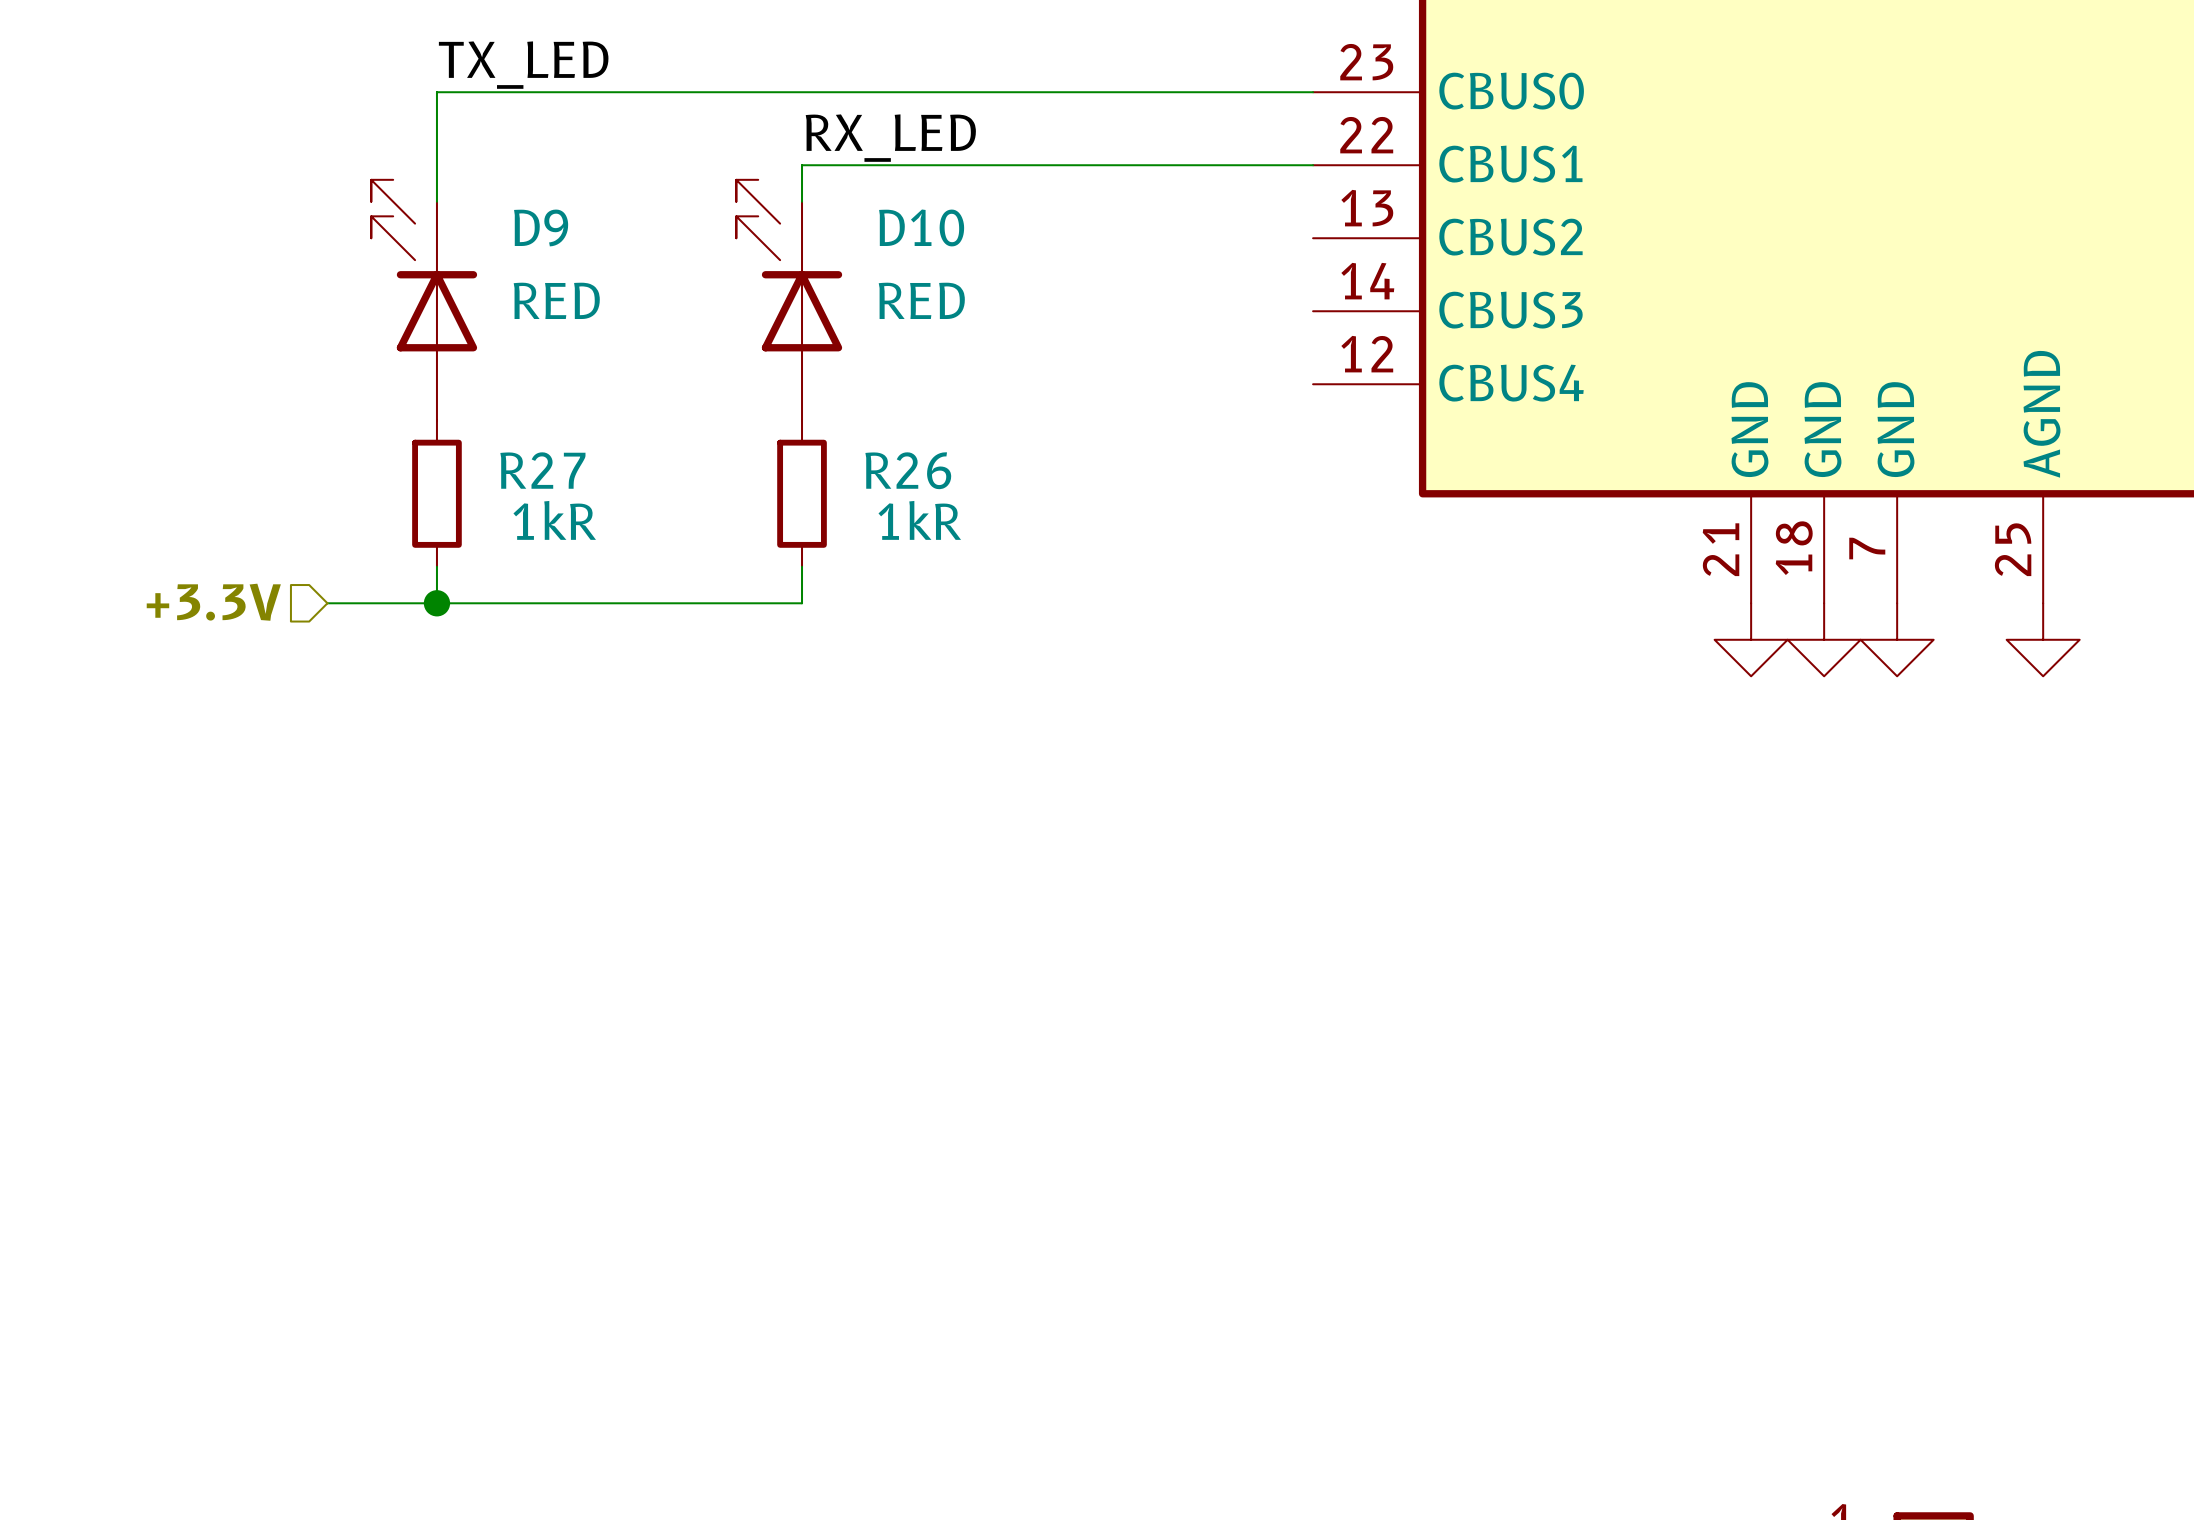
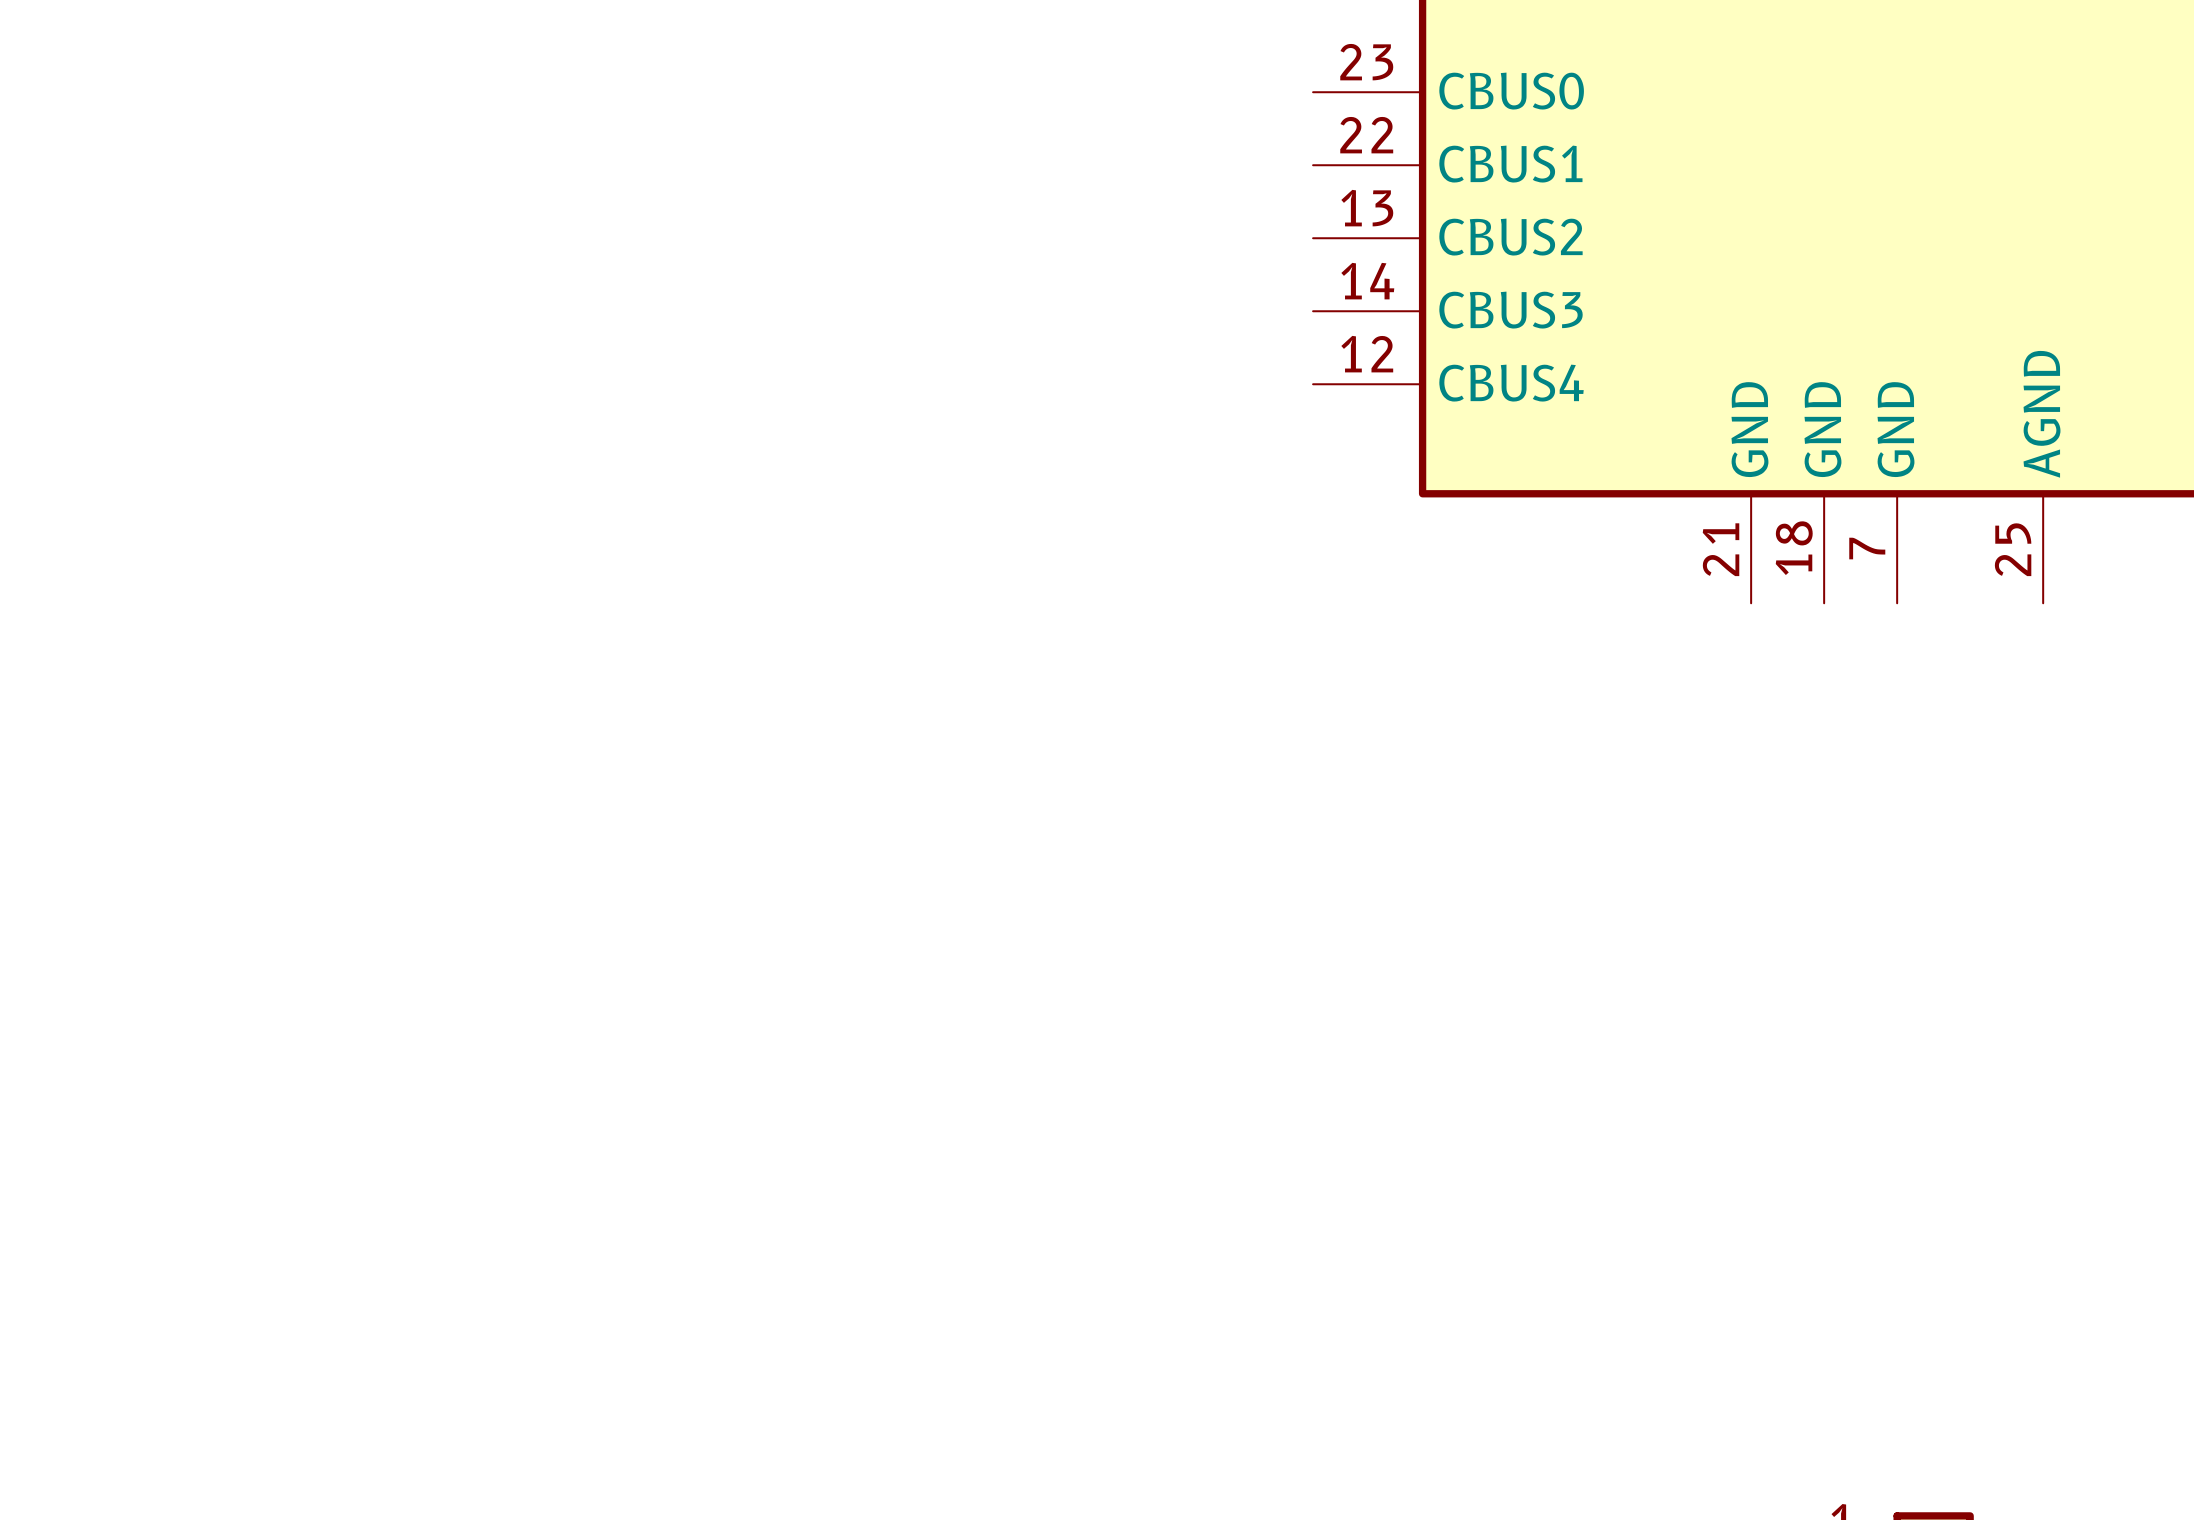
label: TX_LED (523, 65) -> none
wire: (1313, 92) (436, 92) (436, 201) -> none
label: RX_LED (890, 138) -> none
wire: (1313, 165) (802, 165) (802, 201) -> none
D9: RED (424, 300) -> none
D10: RED (789, 300) -> none
R27: 1kR (436, 493) -> none
R26: 1kR (802, 493) -> none
wire: (436, 566) (436, 603) -> none
wire: (802, 566) (802, 603) (327, 603) -> none
hierarchical label: +3.3V (213, 602) -> none
junction: (436, 603) -> none
power symbol: (1751, 639) -> none
power symbol: (1824, 639) -> none
power symbol: (1897, 639) -> none
power symbol: (2043, 639) -> none

